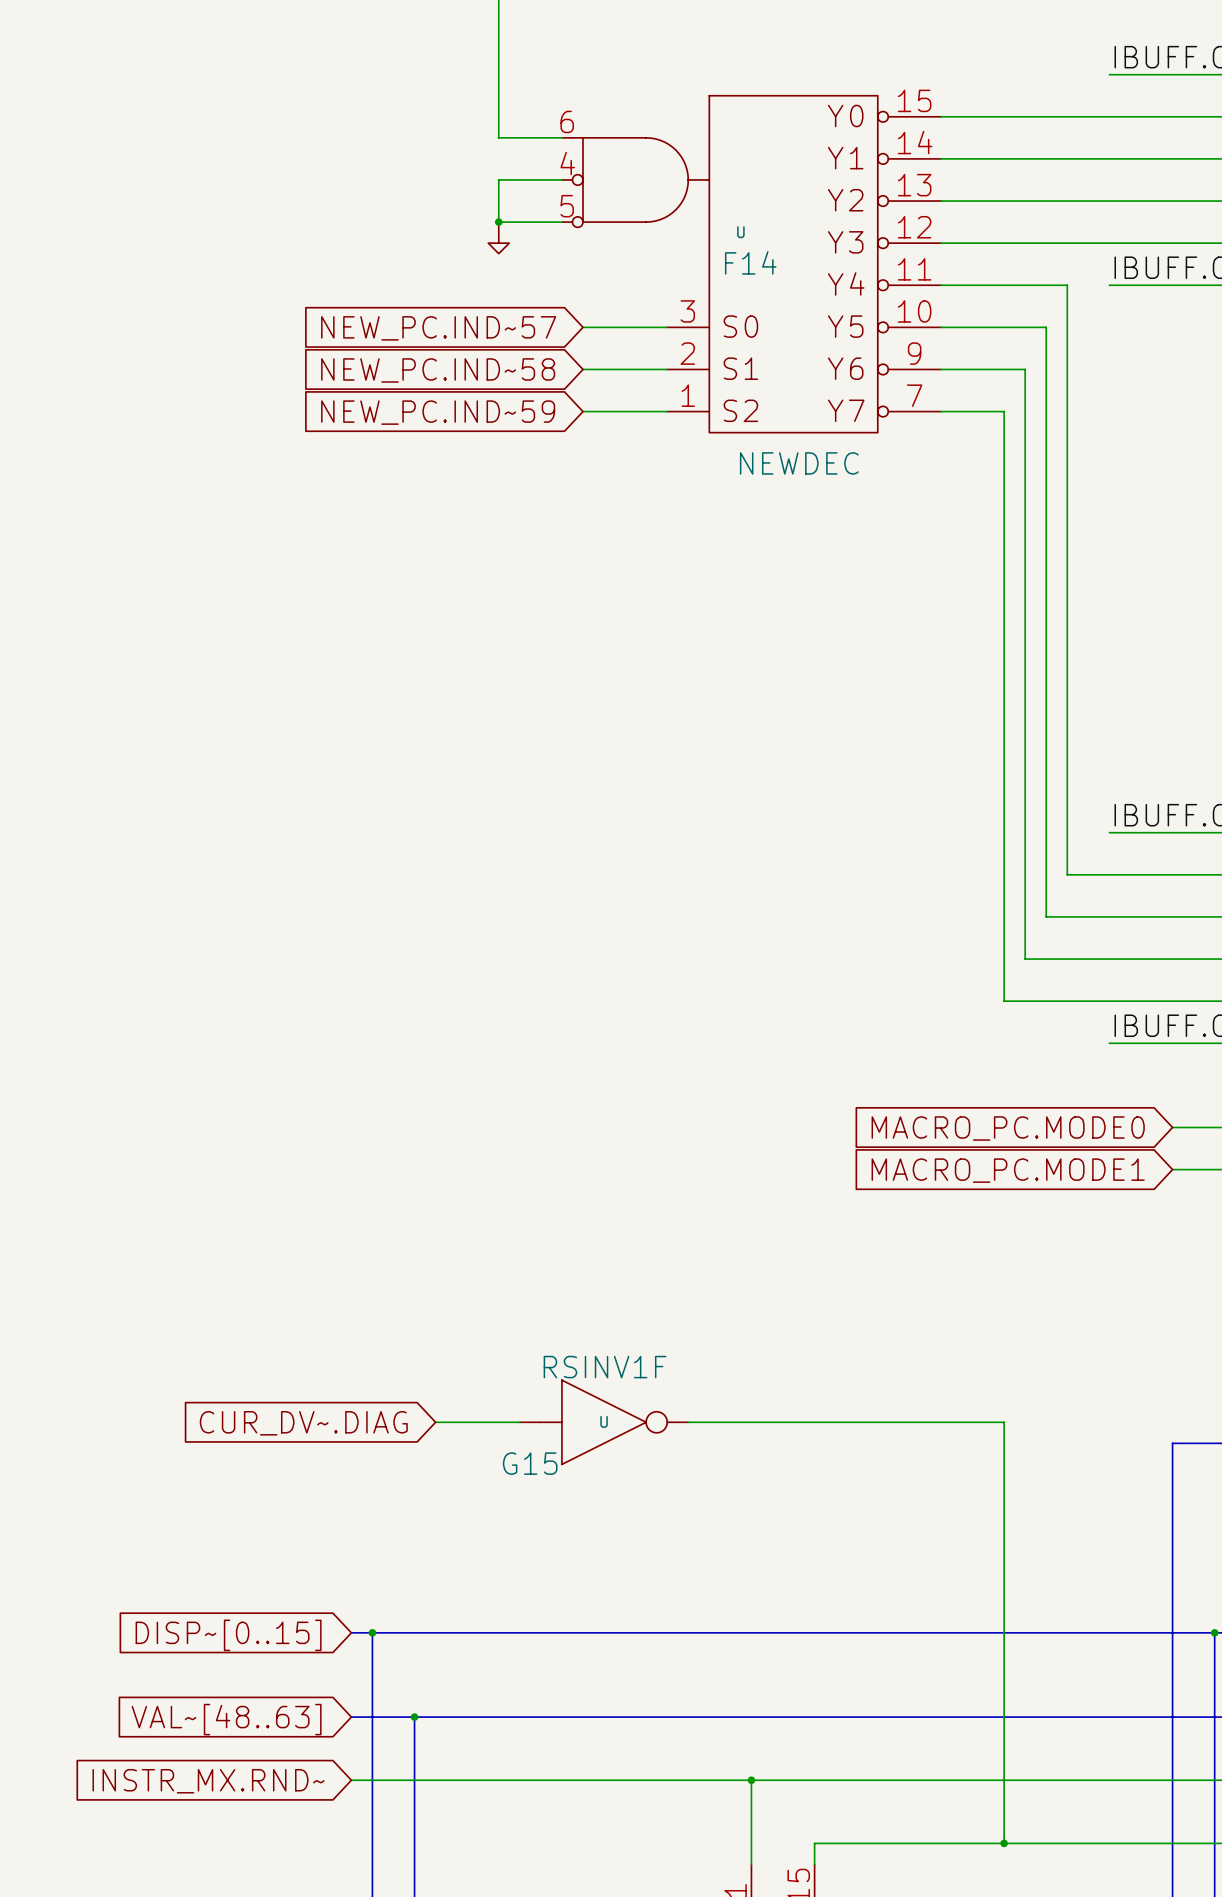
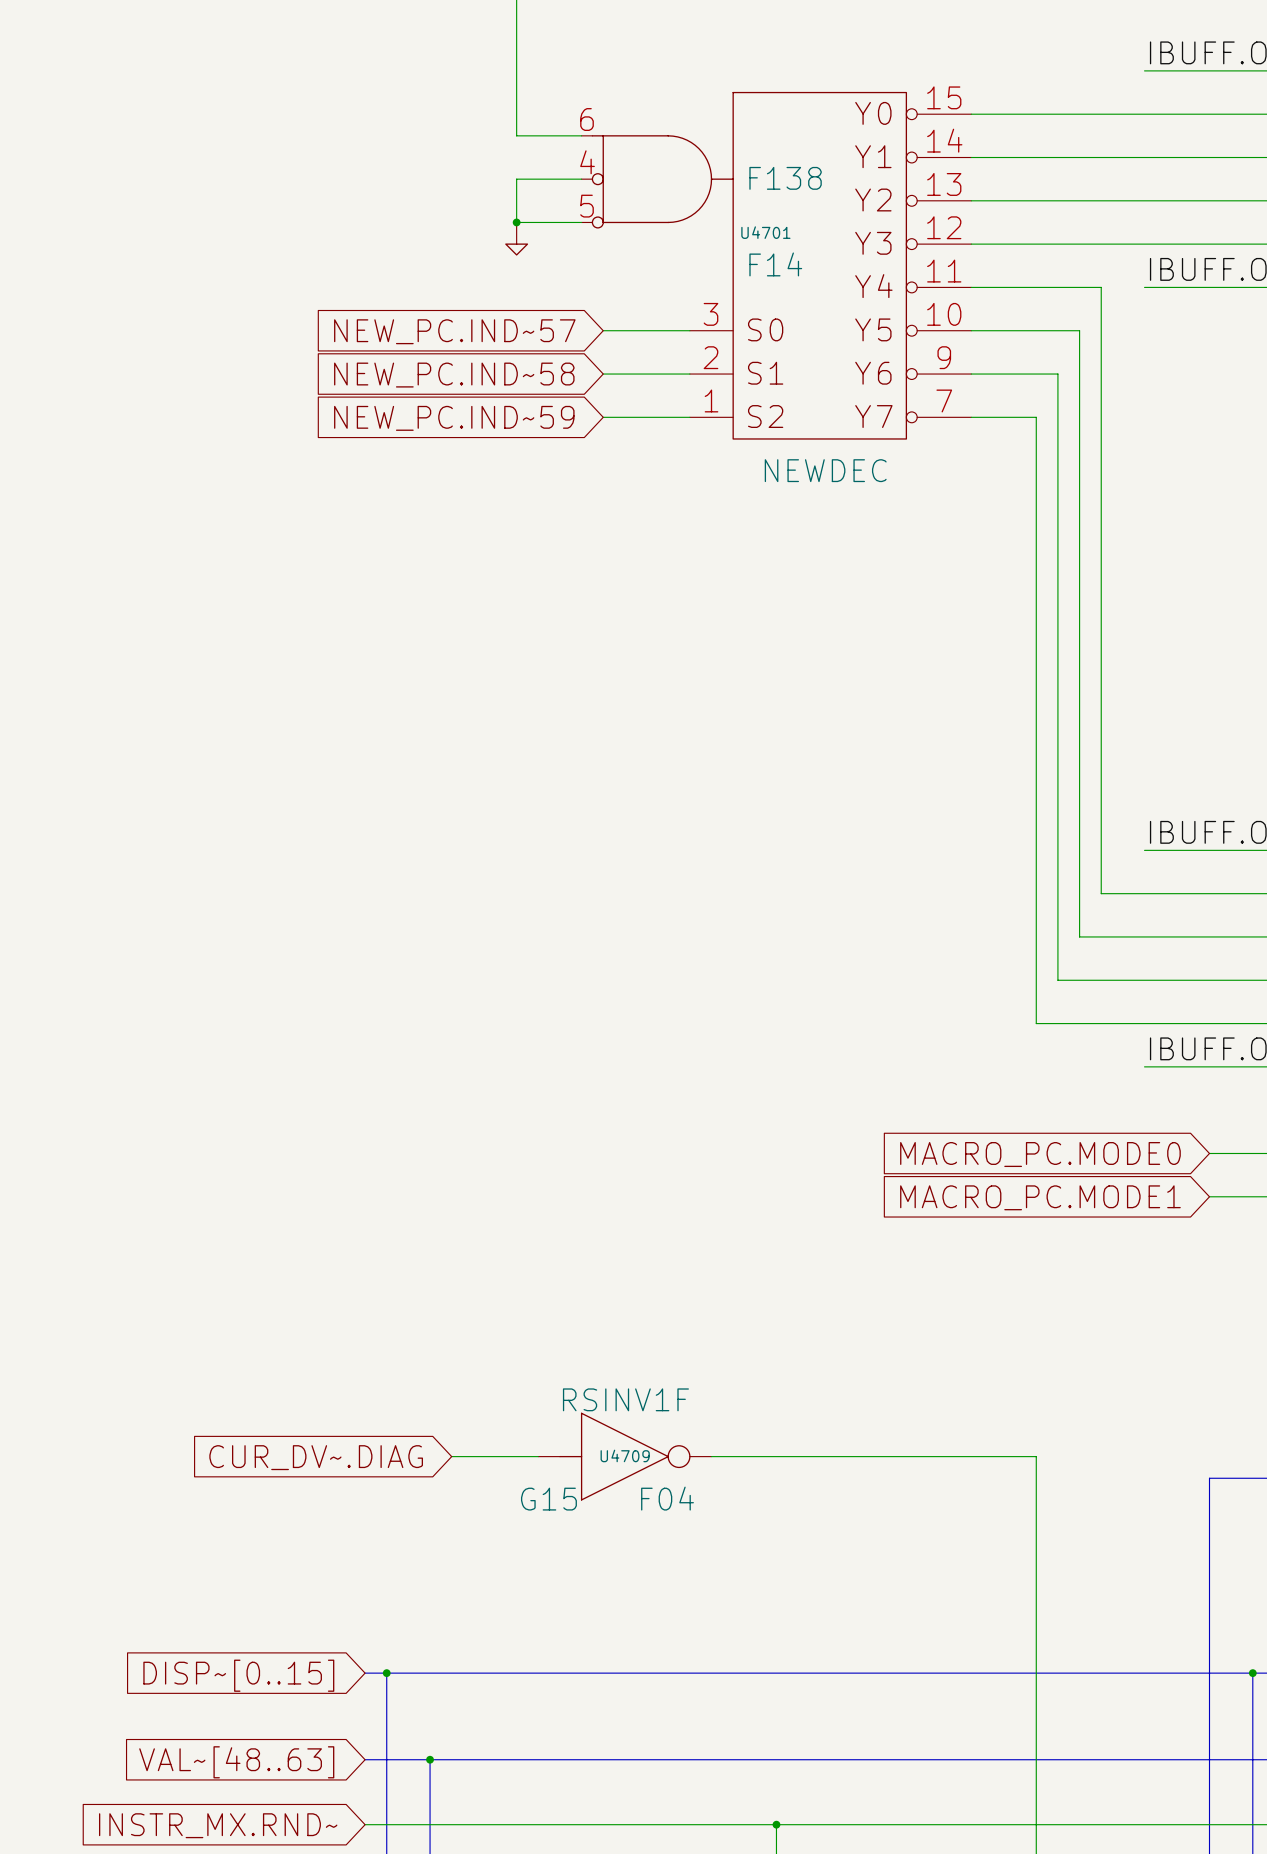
U value: none -> F138 (785, 178)
U name: U (740, 232) -> U4701 (765, 232)
U name: U (604, 1421) -> U4709 (625, 1455)
U value: none -> F04 (667, 1498)

